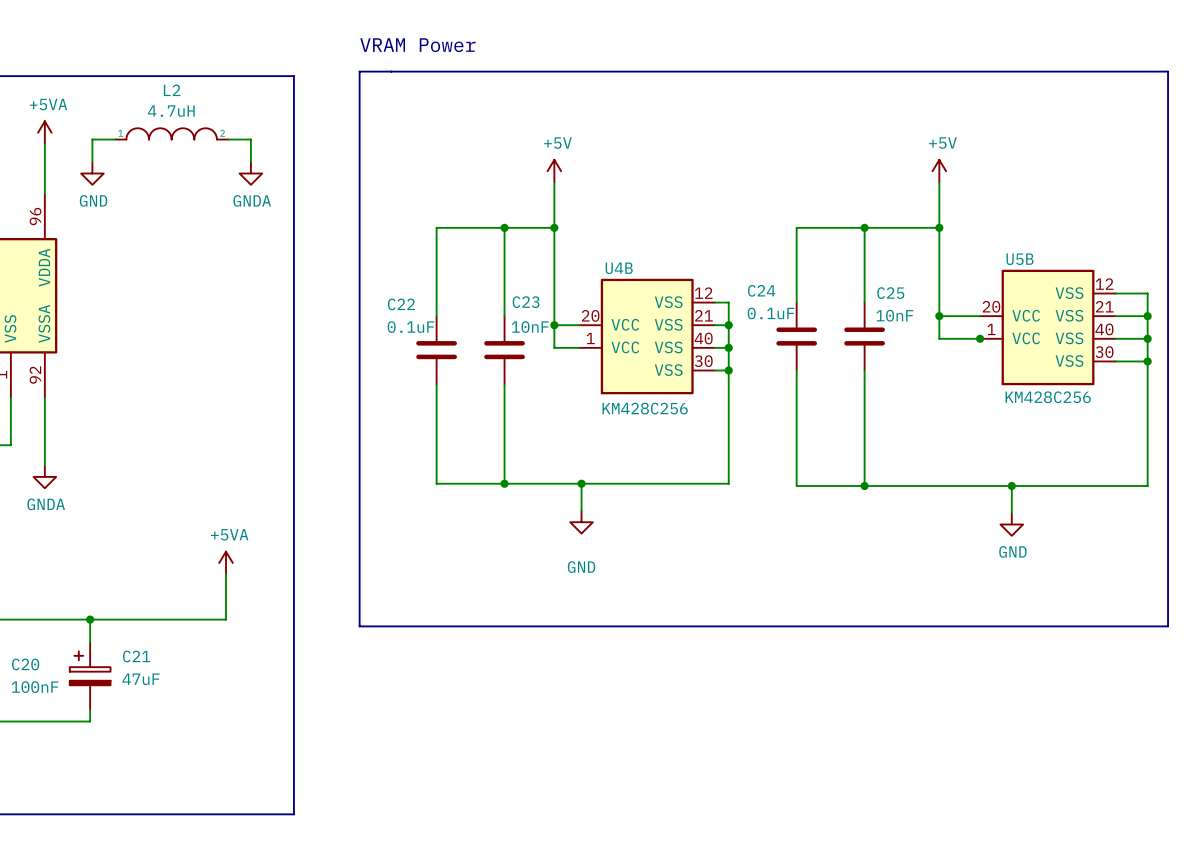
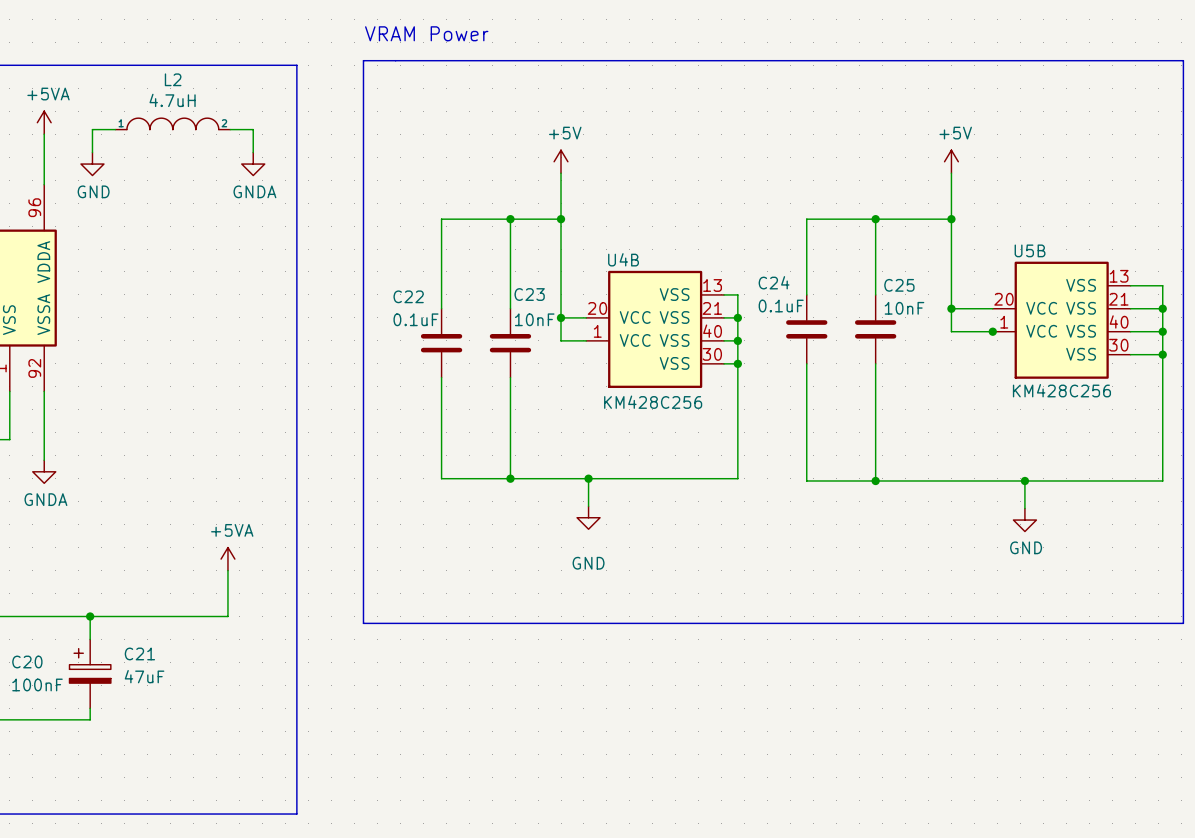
U5B pin number: 12 (1104, 284) -> 13 (1119, 276)
U4B pin number: 12 (703, 293) -> 13 (712, 285)

